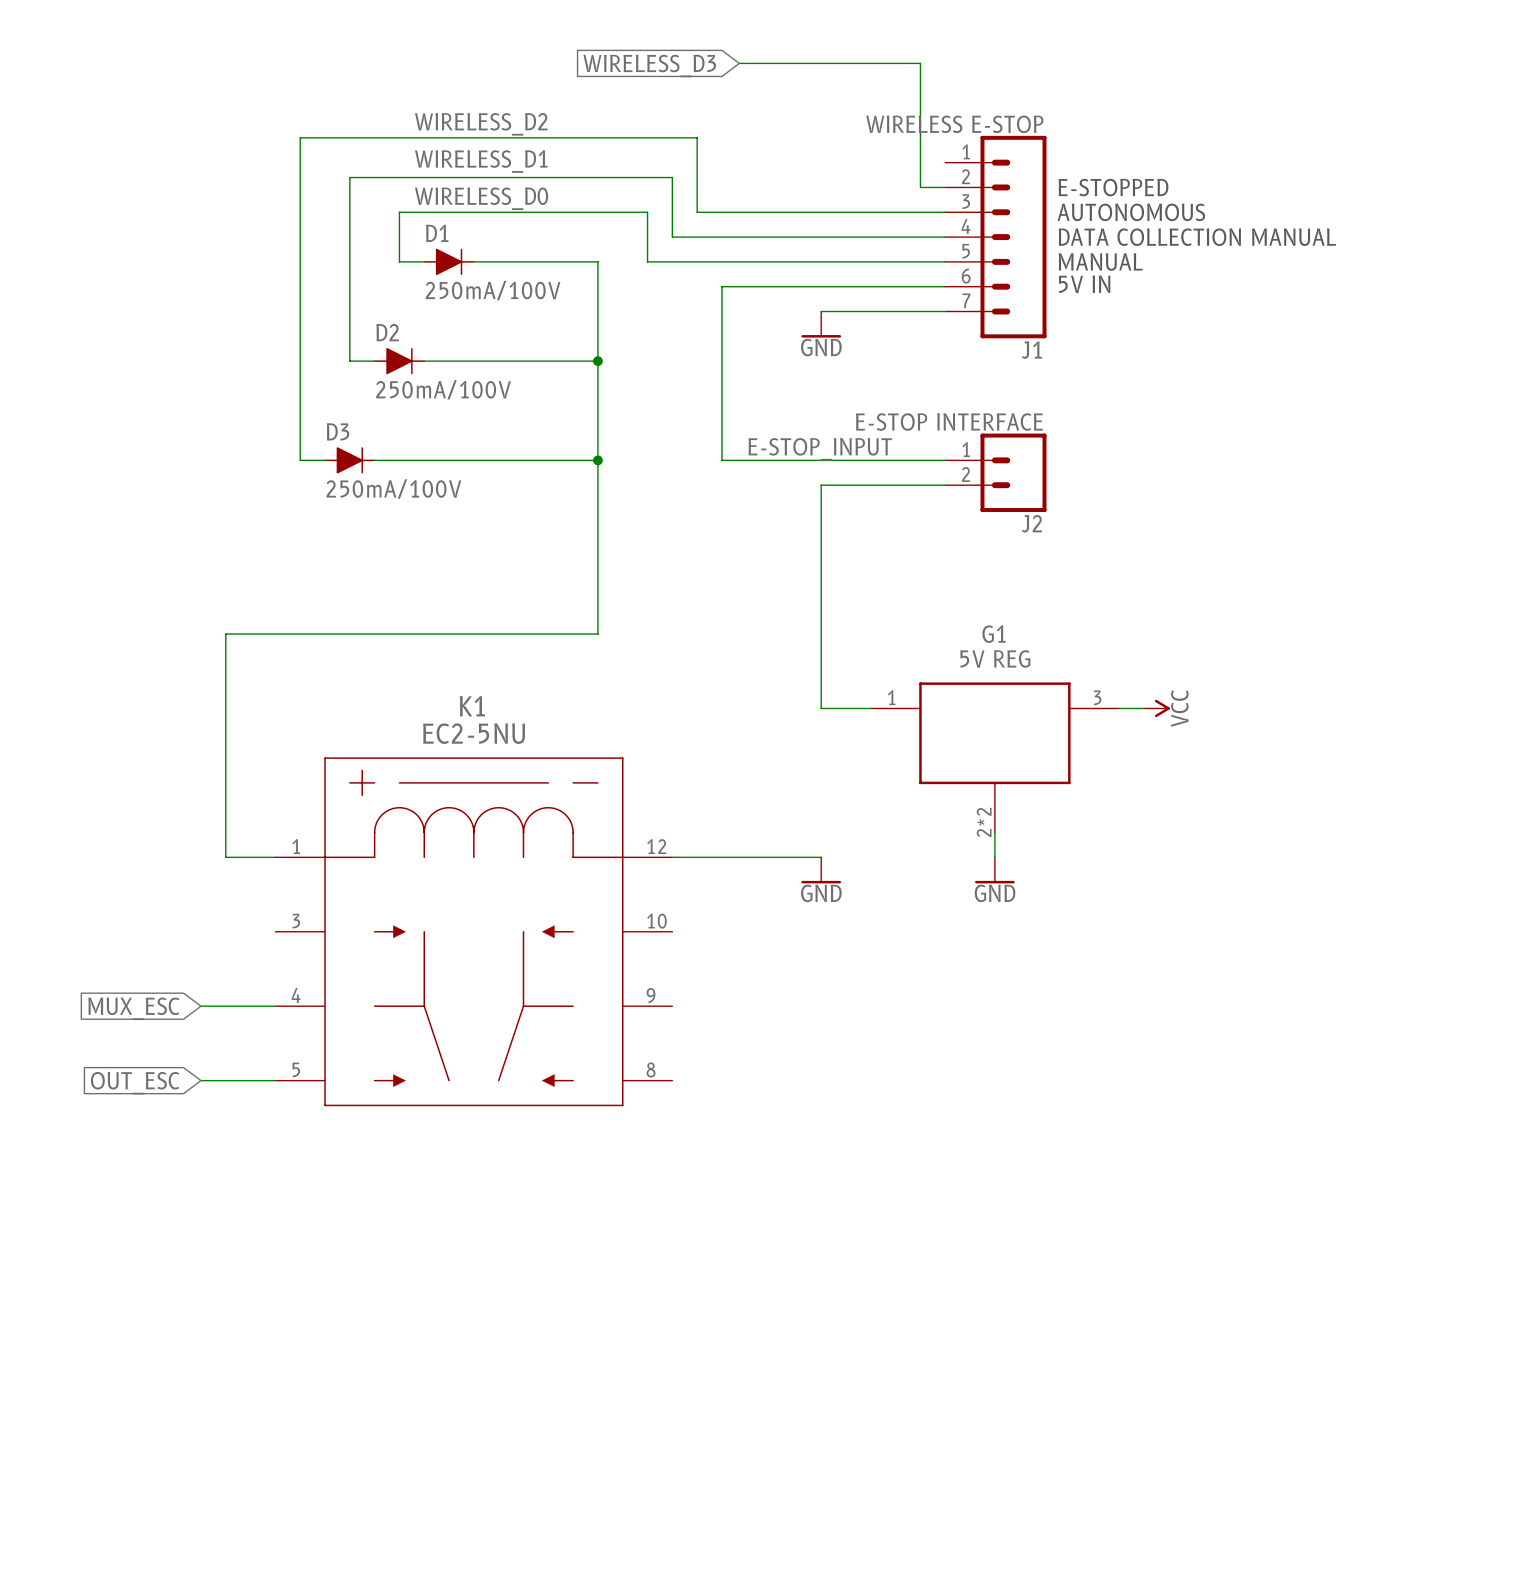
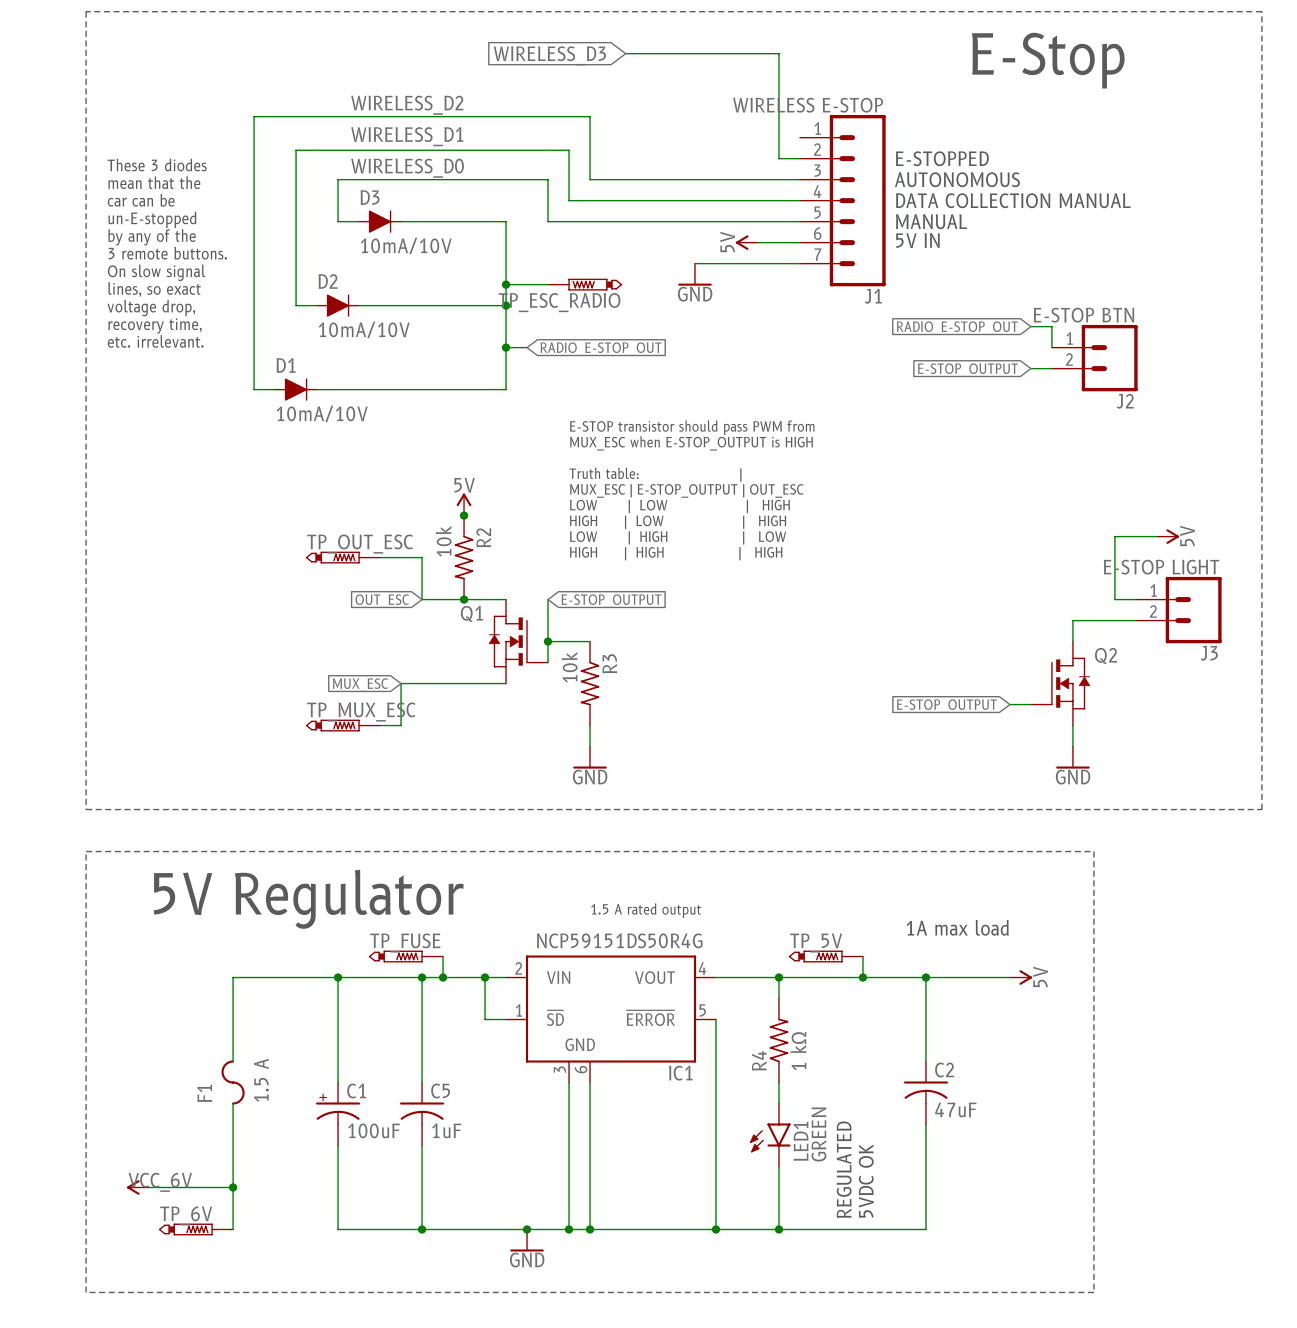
line: none -> (86, 11) (86, 809) (1261, 809) (1261, 11) (86, 11)
text: none -> E-Stop (1048, 60)
text: none -> These 3 diodes (157, 165)
text: none -> mean that the (154, 182)
D1 name: D1 (437, 233) -> D3 (370, 197)
text: none -> car can be (141, 200)
text: none -> un-E-stopped (152, 219)
text: none -> by any of the (152, 237)
power symbol: none -> 5V (746, 242)
wire: (895, 286) (721, 286) (721, 460) (945, 460) -> none
D1 value: 250mA/100V (493, 290) -> 10mA/10V (406, 245)
text: none -> 3 remote buttons. (167, 253)
text: none -> On slow signal (156, 272)
wire: none -> (506, 284) (548, 284)
junction: none -> (506, 284)
TP_ESC_RADIO: none -> (585, 284)
text: none -> lines, so exact (154, 289)
text: none -> voltage drop, (151, 308)
text: none -> recovery time, (155, 326)
wire: none -> (1030, 326) (1051, 326) (1051, 347)
global label: none -> RADIO_E-STOP_OUT (957, 328)
D2 value: 250mA/100V (443, 389) -> 10mA/10V (364, 329)
text: none -> etc. irrelevant. (155, 341)
wire: none -> (506, 347) (527, 347)
global label: none -> RADIO_E-STOP_OUT (601, 349)
J2 value: E-STOP INTERFACE (949, 422) -> E-STOP BTN (1083, 315)
D3 name: D3 (338, 431) -> D1 (286, 365)
wire: none -> (1030, 368) (1051, 368)
global label: none -> E-STOP_OUTPUT (967, 370)
label: E-STOP_INPUT (820, 449) -> none
wire: (597, 460) (597, 634) (225, 634) (225, 857) (275, 857) -> none
junction position: (597, 460) -> (506, 347)
J2 position: (995, 472) -> (1094, 358)
wire: (945, 485) (821, 485) (821, 708) (870, 708) -> none
D3 value: 250mA/100V (393, 489) -> 10mA/10V (322, 413)
text: none -> E-STOP transistor should pass PWM from (692, 427)
text: none -> MUX_ESC when E-STOP_OUTPUT is HIGH (691, 443)
text: none -> Truth table: | (655, 474)
text: none -> MUX_ESC | E-STOP_OUTPUT | OUT_ESC (686, 490)
power symbol: none -> 5V (464, 504)
text: none -> LOW | LOW | HIGH (679, 506)
junction: none -> (464, 515)
text: none -> HIGH | LOW | HIGH (678, 522)
wire: none -> (1156, 536) (1114, 536) (1114, 599) (1135, 599)
power symbol: none -> 5V (1167, 536)
text: none -> LOW | HIGH | LOW (678, 537)
text: none -> HIGH | HIGH | HIGH (676, 553)
TP_OUT_ESC: none -> (342, 557)
wire: none -> (380, 557) (422, 557) (422, 599) (506, 599)
R2: none -> 10k (464, 557)
junction: none -> (464, 599)
wire: none -> (548, 599) (548, 662)
wire: (1118, 708) (1143, 708) -> (1009, 704) (1030, 704)
power symbol: VCC (1156, 708) -> none
global label: none -> OUT_ESC (382, 601)
global label: none -> E-STOP_OUTPUT (611, 601)
J3: none -> E-STOP LIGHT (1178, 610)
wire: none -> (1135, 620) (1072, 620) (1072, 641)
G1: 5V REG (994, 757) -> none
Q1: none -> (518, 641)
wire: none -> (548, 641) (590, 641)
junction: none -> (548, 641)
wire: none -> (506, 683) (401, 683) (401, 725) (380, 725)
R3: none -> 10k (590, 683)
Q2: none -> (1060, 683)
global label: none -> MUX_ESC (360, 685)
wire: (994, 832) (994, 857) -> none
global label: none -> E-STOP_OUTPUT (946, 706)
TP_MUX_ESC: none -> (342, 725)
wire: (672, 857) (821, 857) -> none
wire: none -> (590, 725) (590, 746)
wire: none -> (1072, 725) (1072, 746)
power symbol position: GND (821, 870) -> GND (590, 757)
power symbol: GND (994, 870) -> none
power symbol: none -> GND (1072, 757)
K1: EC2-5NU (473, 931) -> none
line: none -> (86, 851) (86, 1292) (1093, 1292) (1093, 851) (86, 851)
global label: MUX_ESC (133, 1008) -> none
text: none -> 5V Regulator (308, 899)
text: none -> 1.5 A rated output (646, 910)
wire: (200, 1080) (275, 1080) -> none
global label: OUT_ESC (135, 1083) -> none
text: none -> 1A max load (957, 927)
TP_FUSE: none -> (405, 956)
wire: none -> (443, 956) (443, 977)
TP_5V: none -> (825, 956)
wire: none -> (862, 956) (862, 977)
wire: none -> (338, 977) (338, 1082)
junction: none -> (338, 977)
wire: none -> (422, 977) (422, 1082)
junction: none -> (422, 977)
junction: none -> (443, 977)
wire: none -> (485, 977) (485, 1019) (506, 1019)
junction: none -> (485, 977)
wire: none -> (506, 977) (233, 977) (233, 1061)
wire: none -> (715, 977) (1009, 977)
wire: none -> (778, 977) (778, 998)
junction: none -> (778, 977)
junction: none -> (862, 977)
wire: none -> (925, 977) (925, 1061)
junction: none -> (925, 977)
power symbol: none -> 5V (1020, 977)
IC1: none -> NCP59151DS50R4G (611, 1018)
wire: none -> (715, 1019) (715, 1229)
R4: none -> 1 kΩ (778, 1040)
F1: none -> 1.5 A (233, 1082)
wire: none -> (569, 1082) (569, 1229)
wire: none -> (590, 1082) (590, 1229)
wire: none -> (778, 1082) (778, 1103)
C2: none -> 47uF (925, 1093)
wire: none -> (233, 1103) (233, 1229)
C1: none -> 100uF (338, 1114)
C5: none -> 1uF (422, 1114)
wire: none -> (925, 1124) (925, 1229) (338, 1229) (338, 1145)
LED1: none -> GREEN (770, 1135)
wire: none -> (422, 1145) (422, 1229)
wire: none -> (778, 1166) (778, 1229)
text: none -> REGULATED (844, 1169)
text: none -> 5VDC OK (866, 1181)
label: none -> VCC_6V (160, 1182)
power symbol: none -> (138, 1187)
wire: none -> (149, 1187) (233, 1187)
junction: none -> (233, 1187)
TP_6V: none -> (196, 1229)
junction: none -> (422, 1229)
junction: none -> (527, 1229)
junction: none -> (569, 1229)
junction: none -> (590, 1229)
junction: none -> (715, 1229)
junction: none -> (778, 1229)
power symbol: none -> GND (527, 1240)

